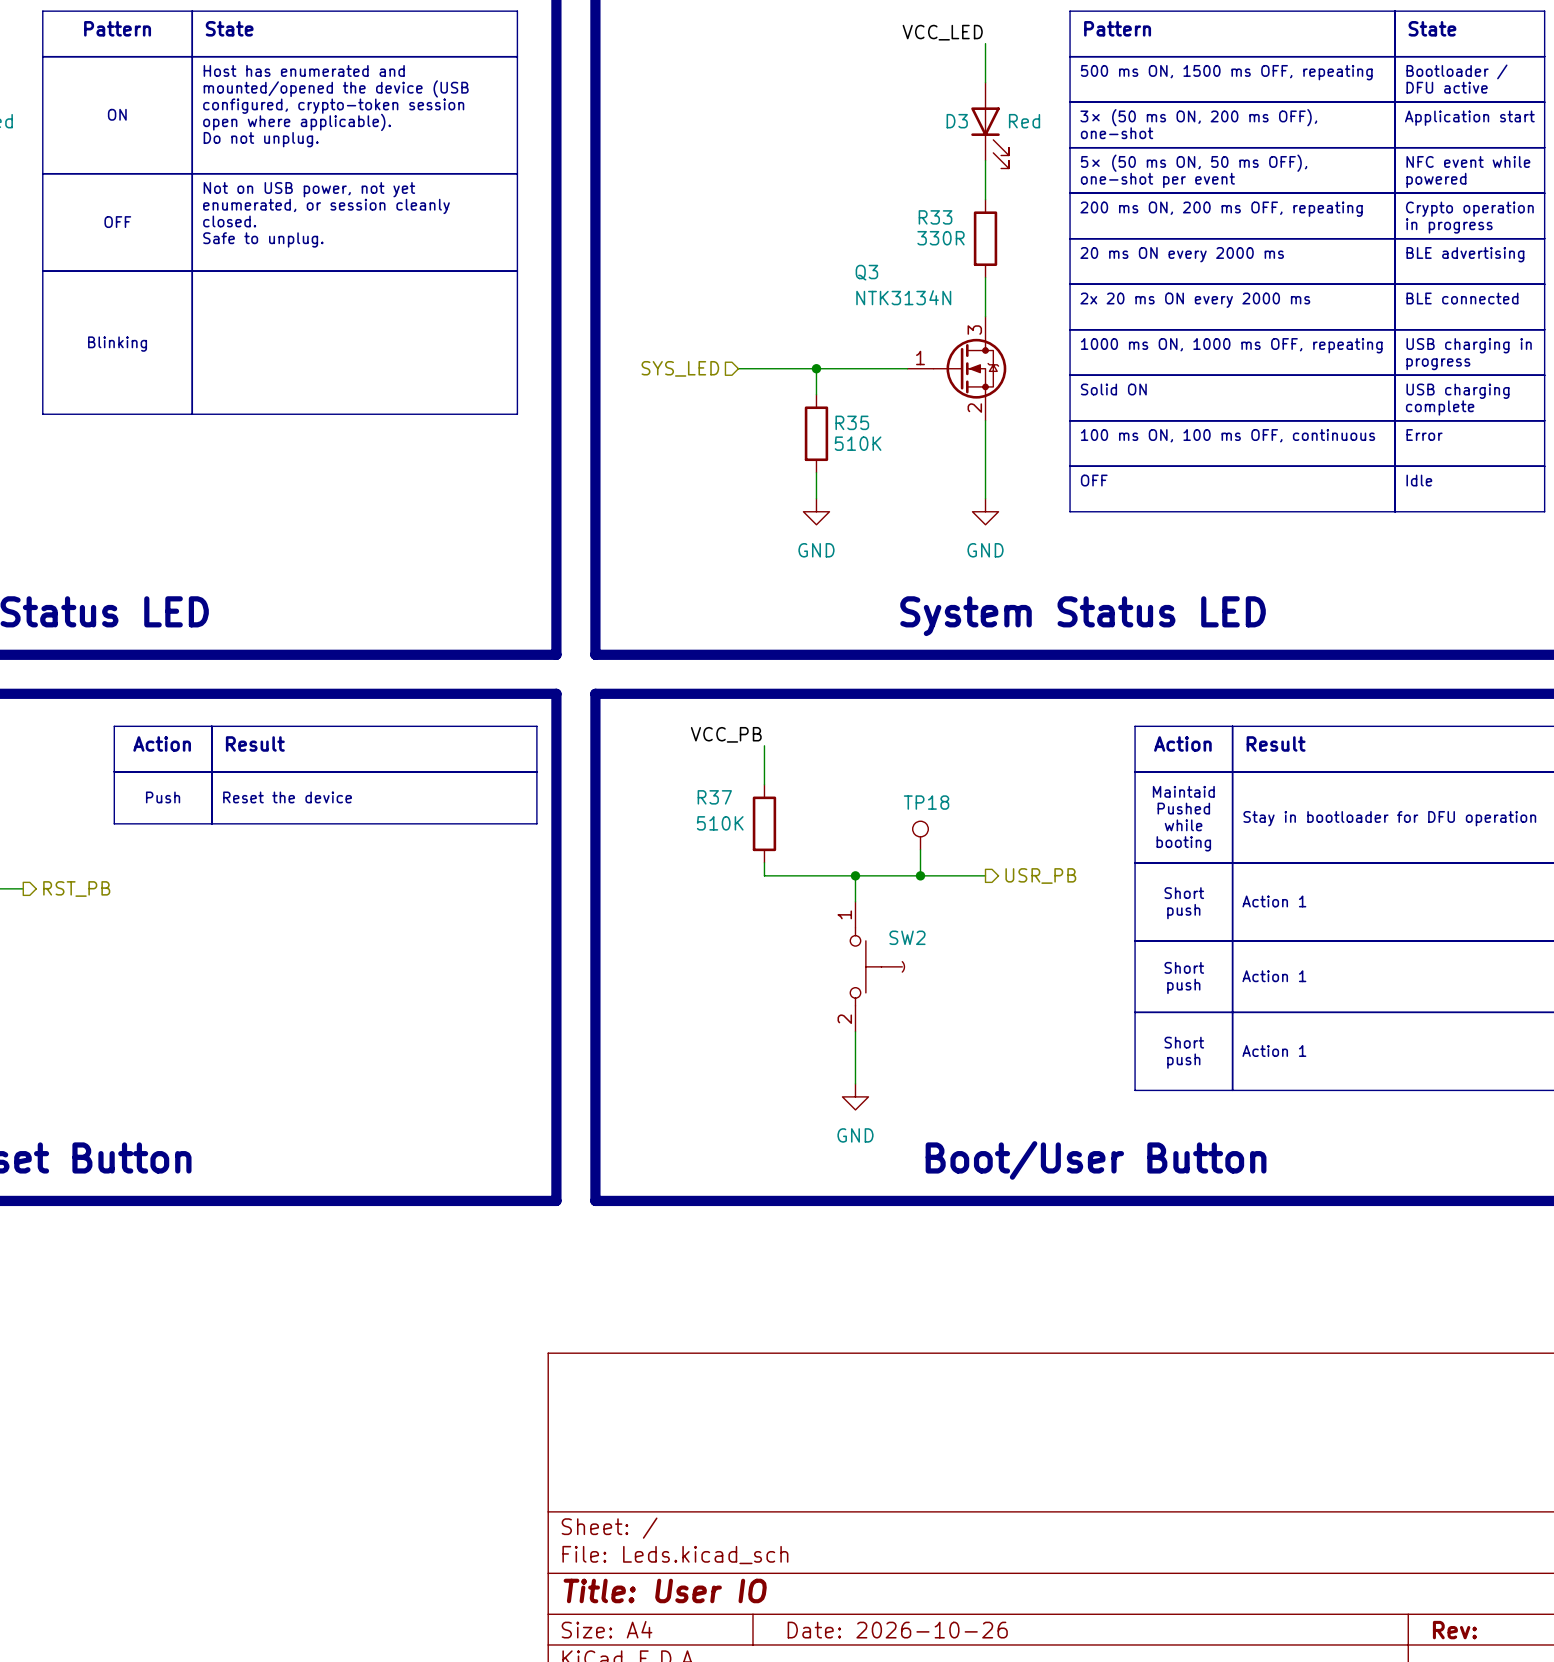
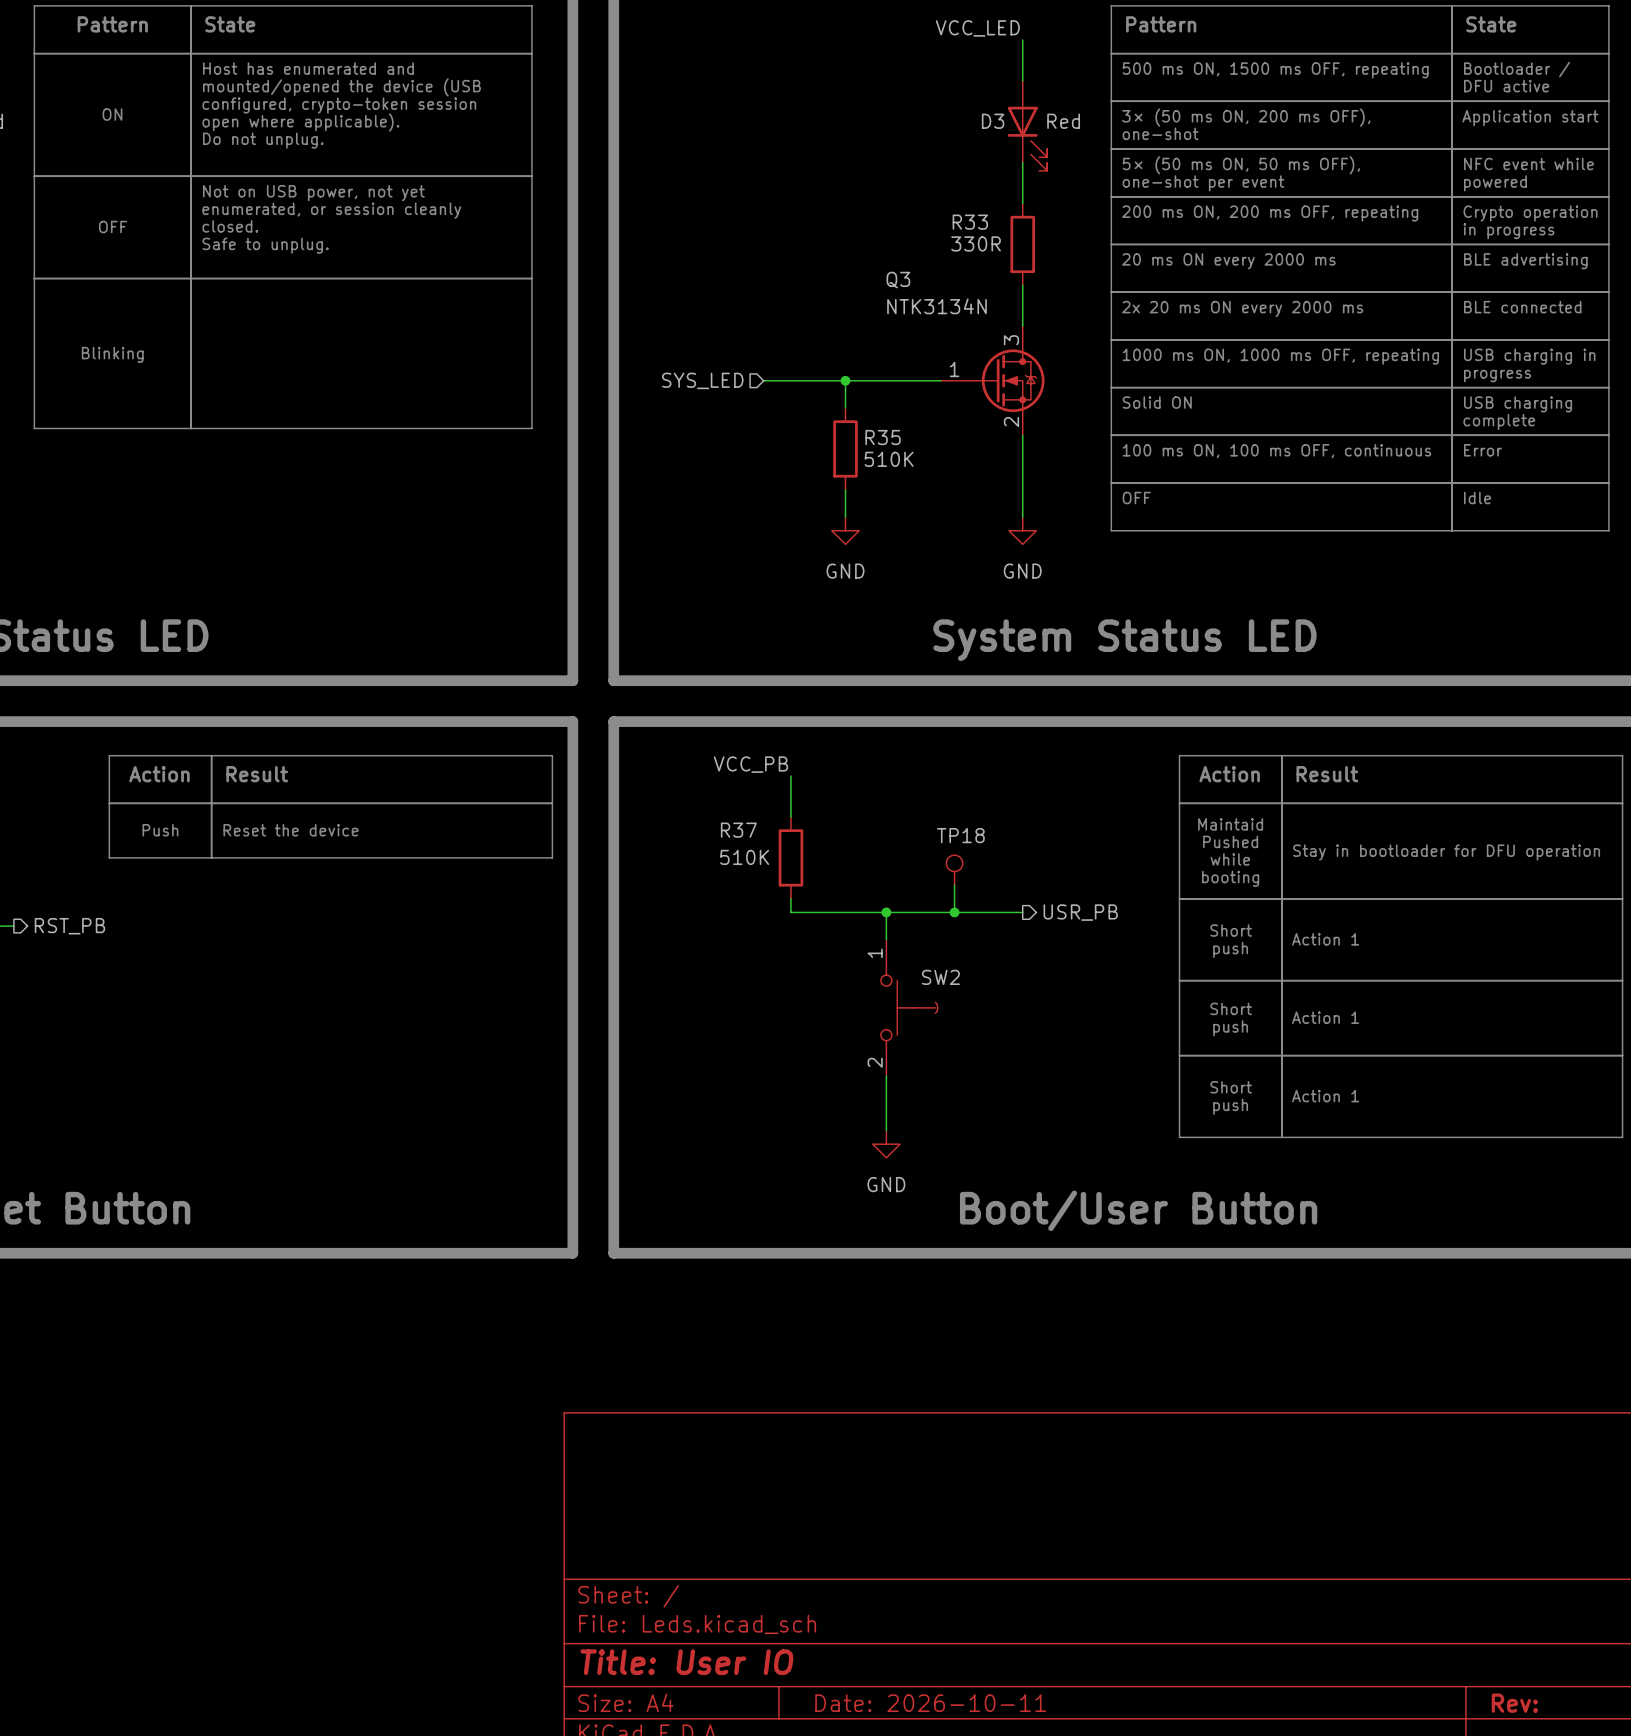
title block: Date: 2026-10-26 (897, 1630) -> Date: 2026-10-11 (930, 1703)

